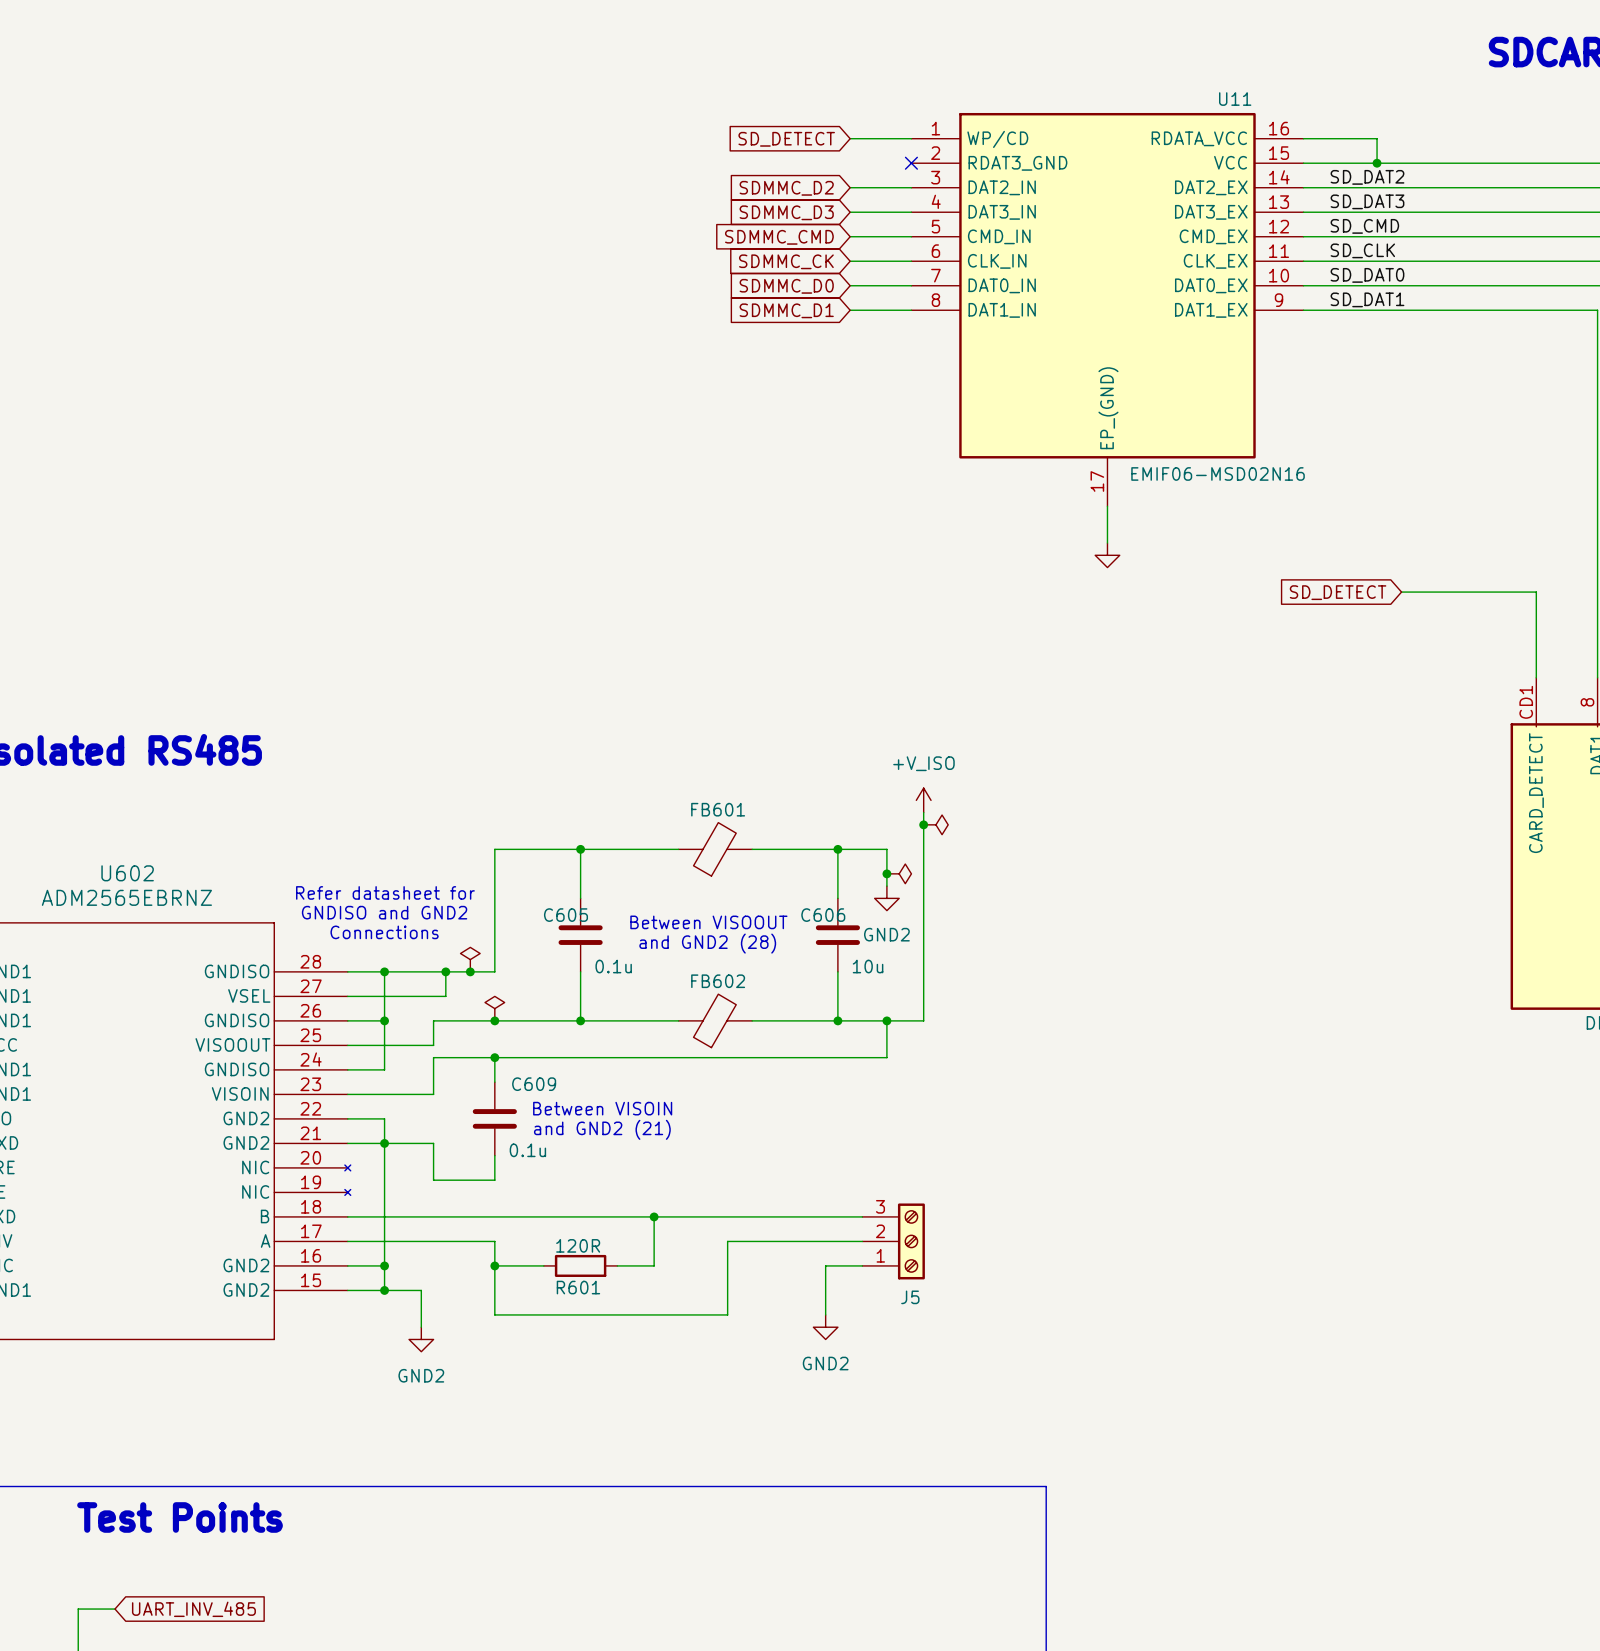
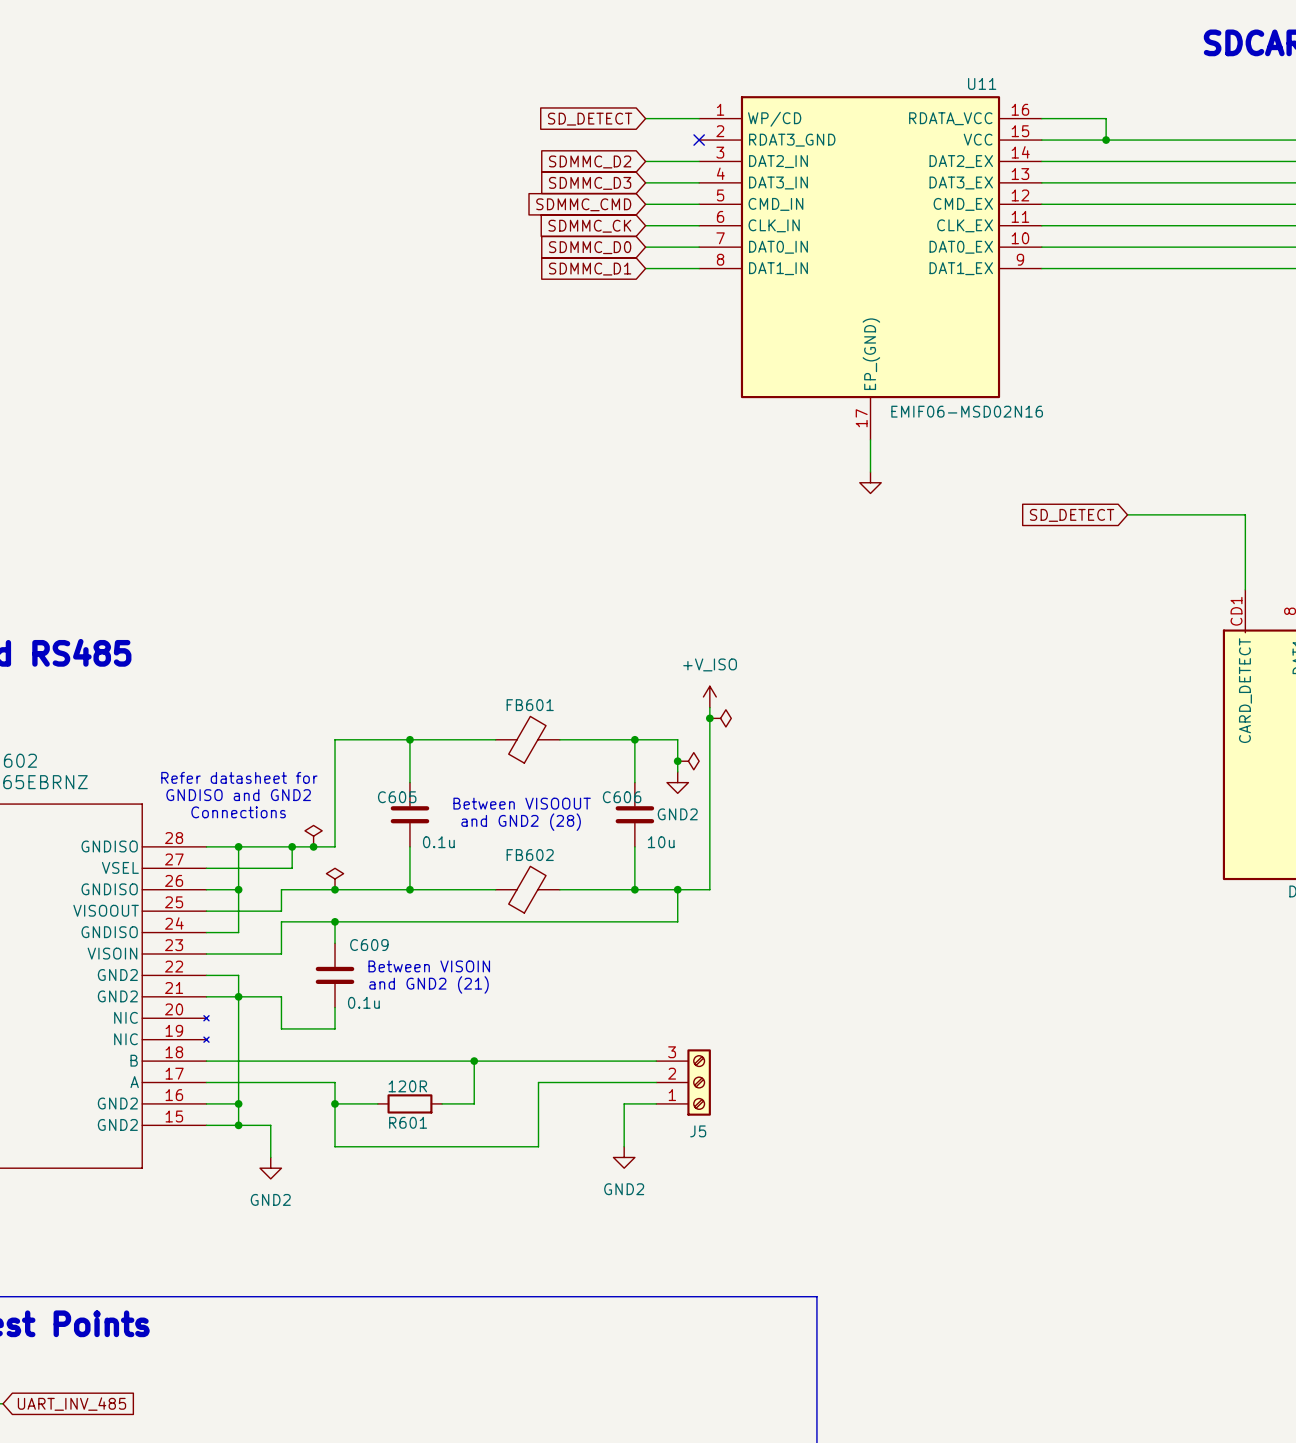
label: SD_DAT2 (1367, 177) -> none
label: SD_DAT3 (1367, 201) -> none
label: SD_CMD (1364, 226) -> none
label: SD_CLK (1362, 250) -> none
label: SD_DAT0 (1367, 275) -> none
label: SD_DAT1 (1367, 299) -> none

